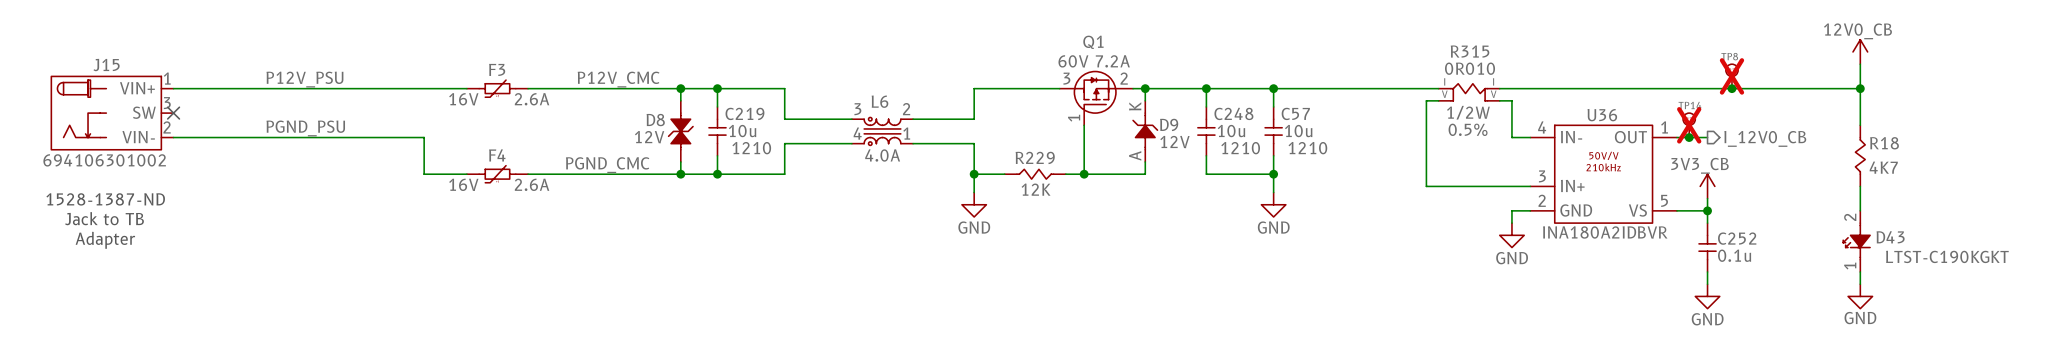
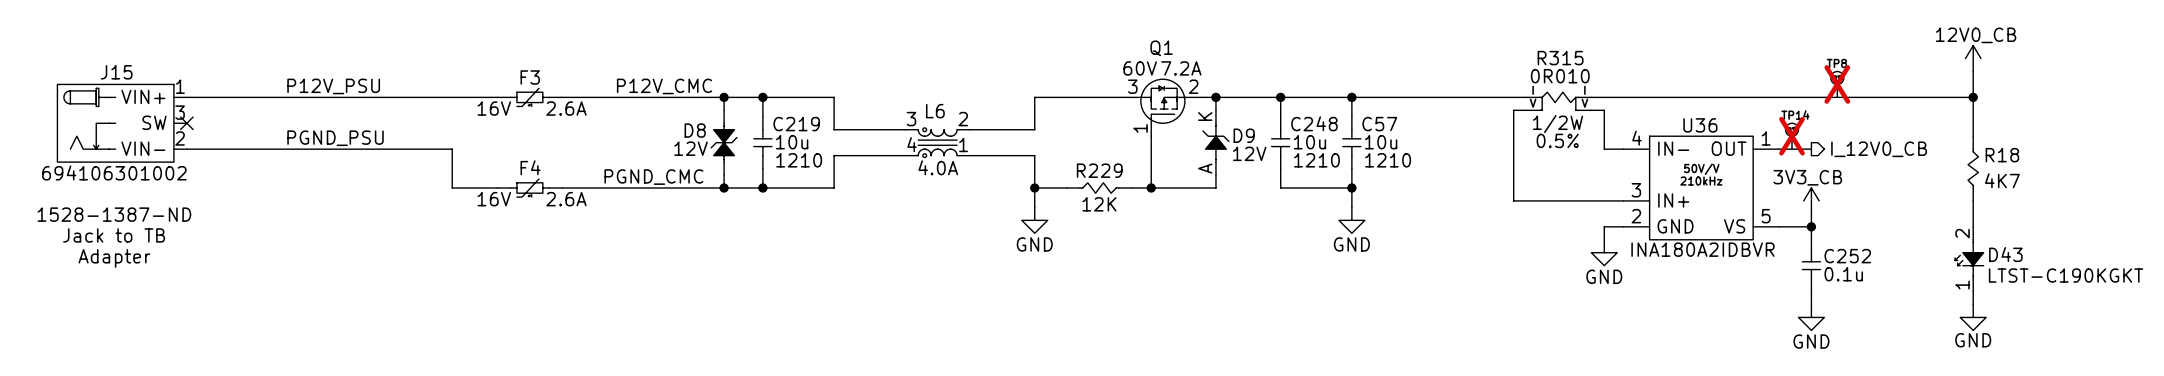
junction: (1731, 88) -> none
junction: (1689, 137) -> none

